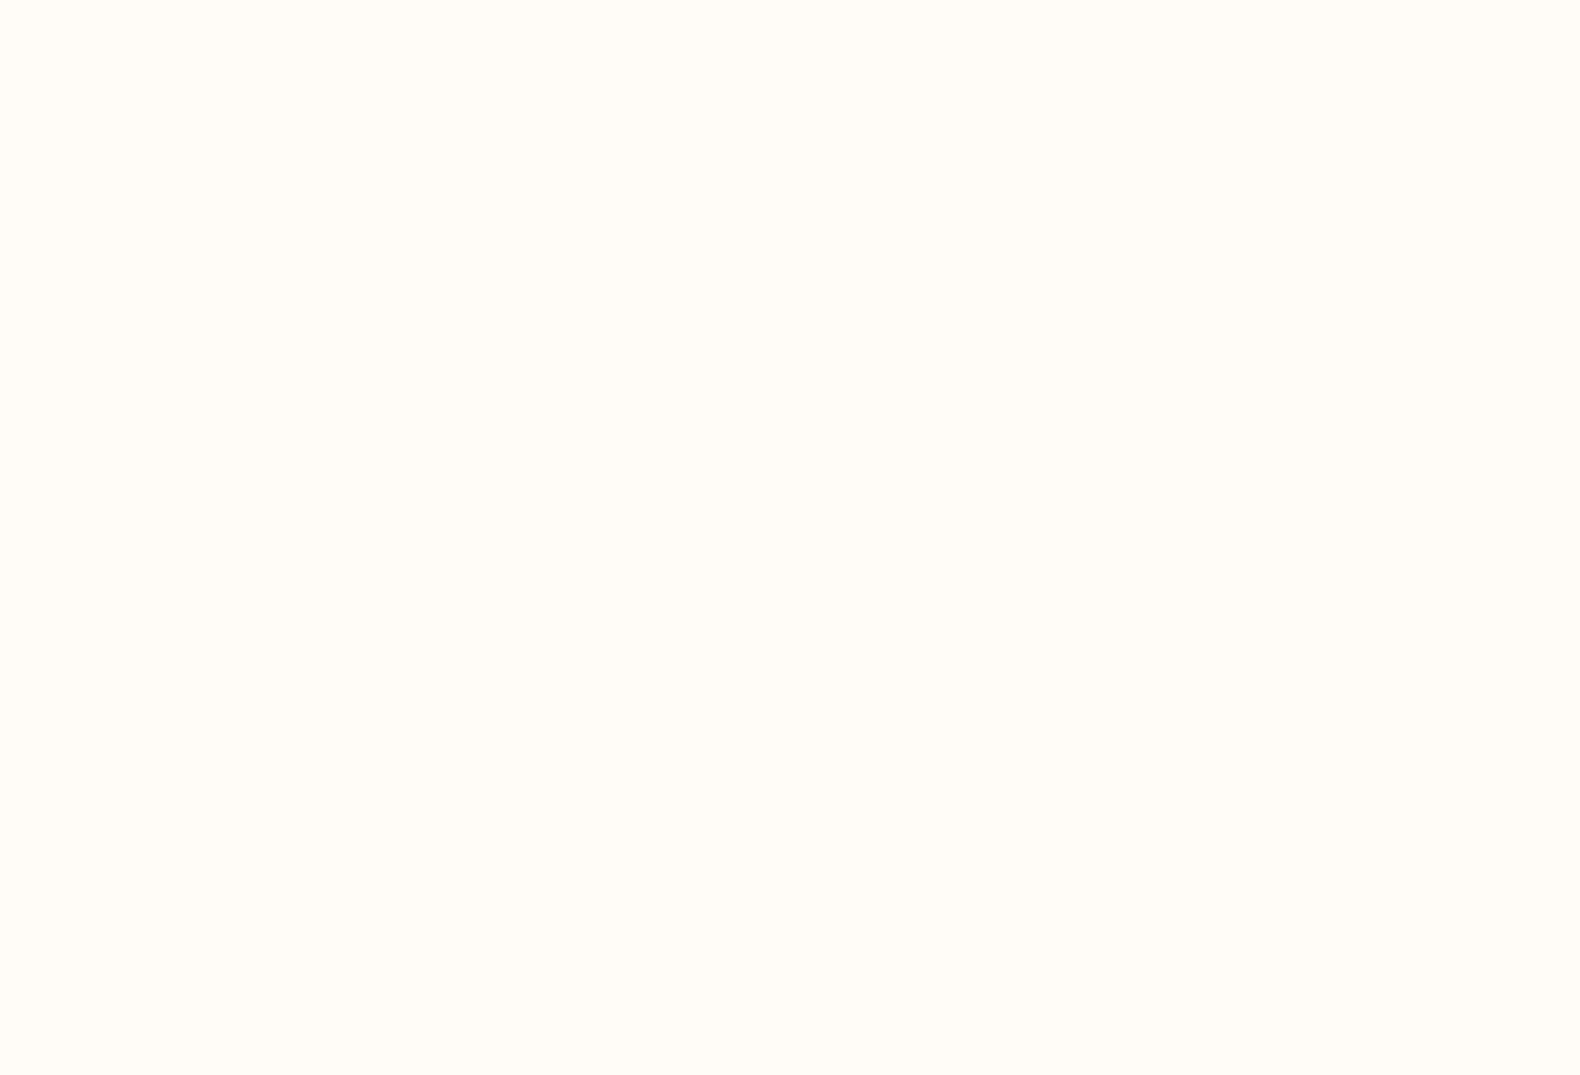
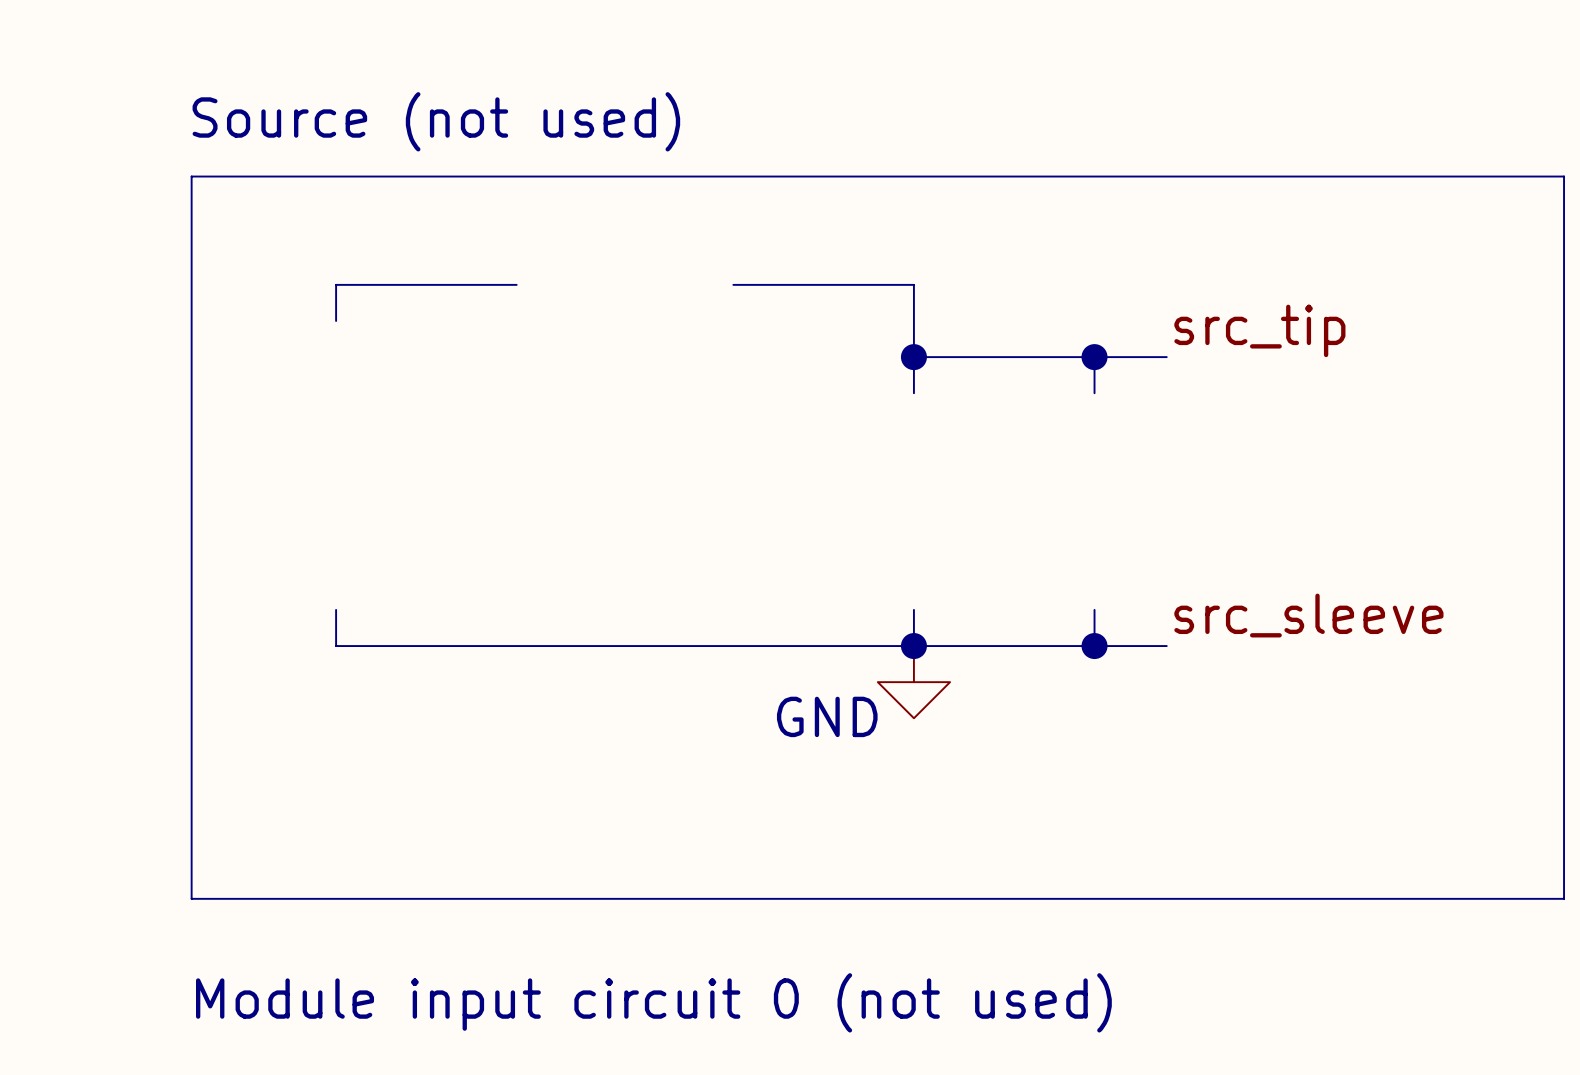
text: none -> Source (not used) (436, 121)
line: none -> (191, 176) (1564, 176) (1564, 898) (191, 898) (191, 176)
wire: none -> (516, 284) (336, 284) (336, 320)
wire: none -> (733, 284) (913, 284) (913, 393)
label: none -> src_tip (1259, 330)
wire: none -> (913, 357) (1166, 357)
junction: none -> (913, 357)
wire: none -> (1094, 357) (1094, 393)
junction: none -> (1094, 357)
wire: none -> (336, 609) (336, 646) (1166, 646)
wire: none -> (913, 609) (913, 646)
wire: none -> (1094, 609) (1094, 646)
label: none -> src_sleeve (1308, 615)
junction: none -> (913, 646)
junction: none -> (1094, 646)
power symbol: none -> GND (913, 682)
text: none -> Module input circuit 0 (not used) (653, 1002)

